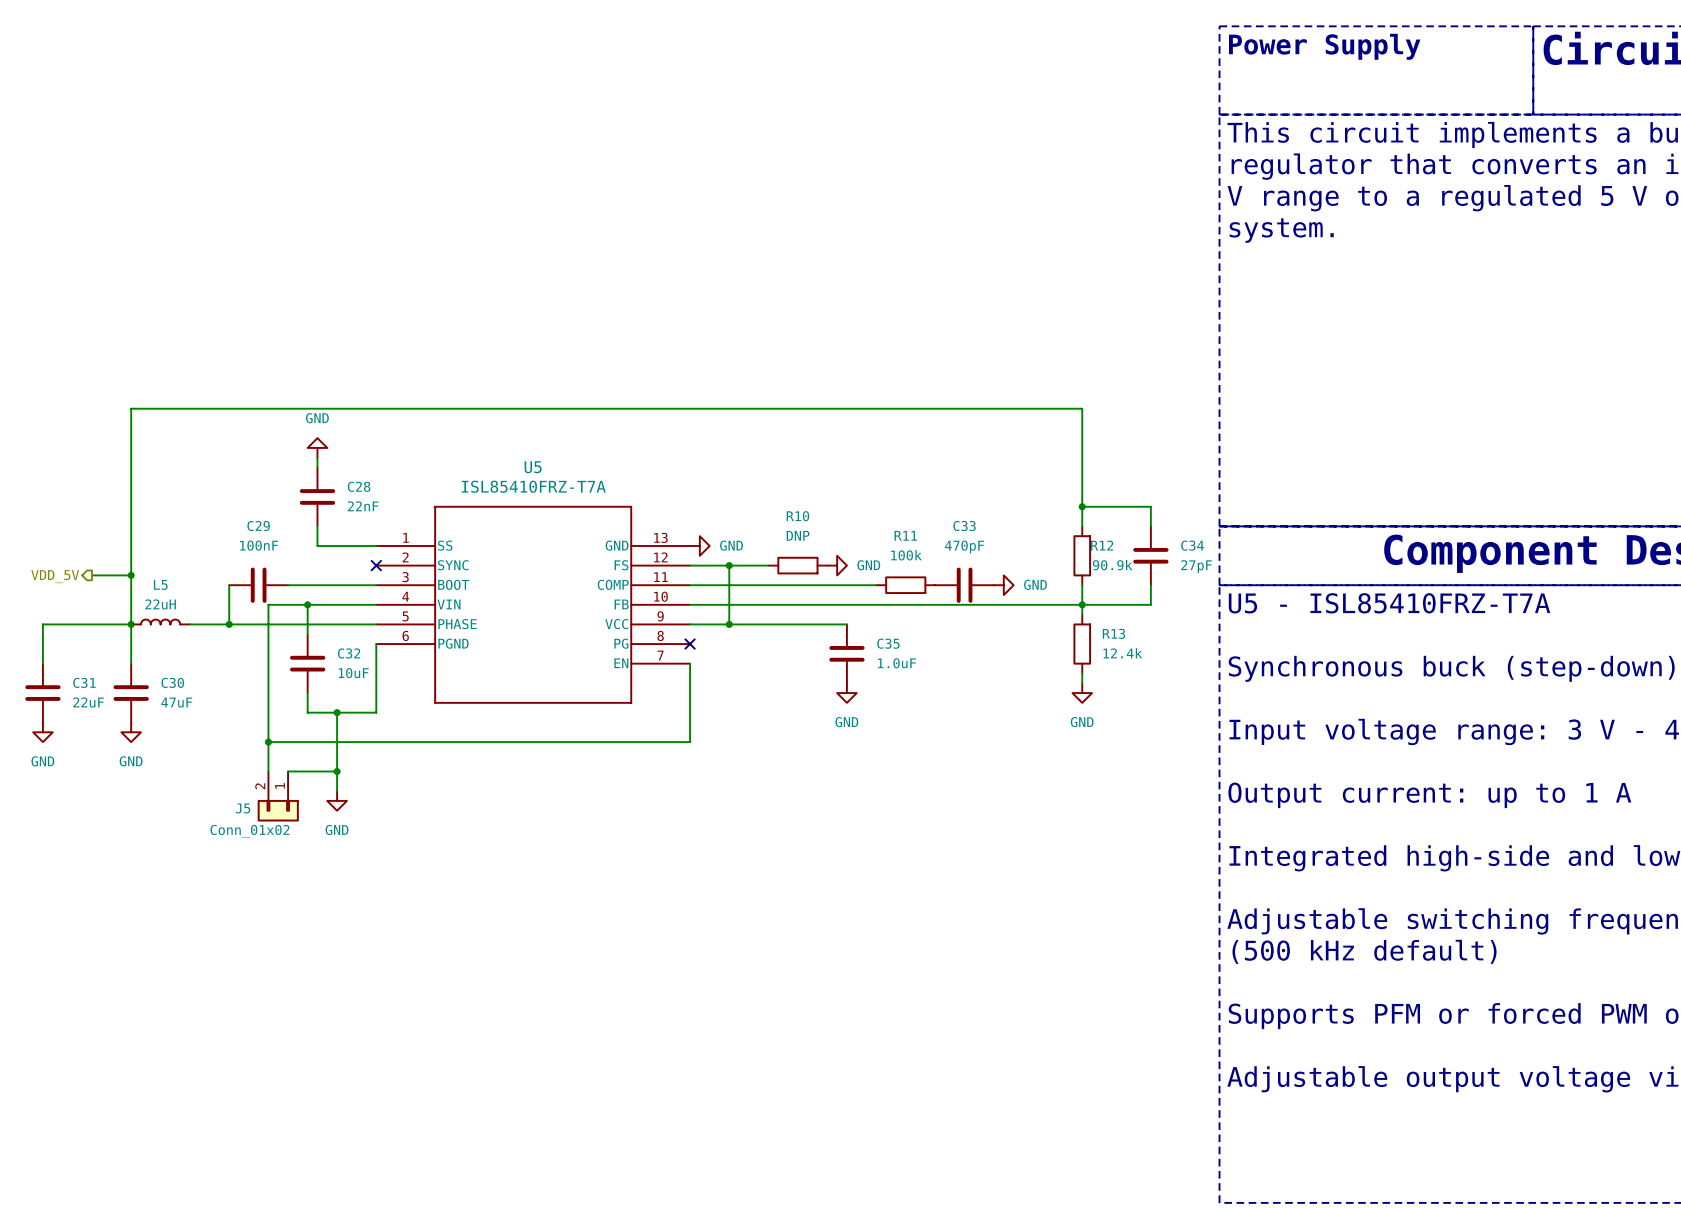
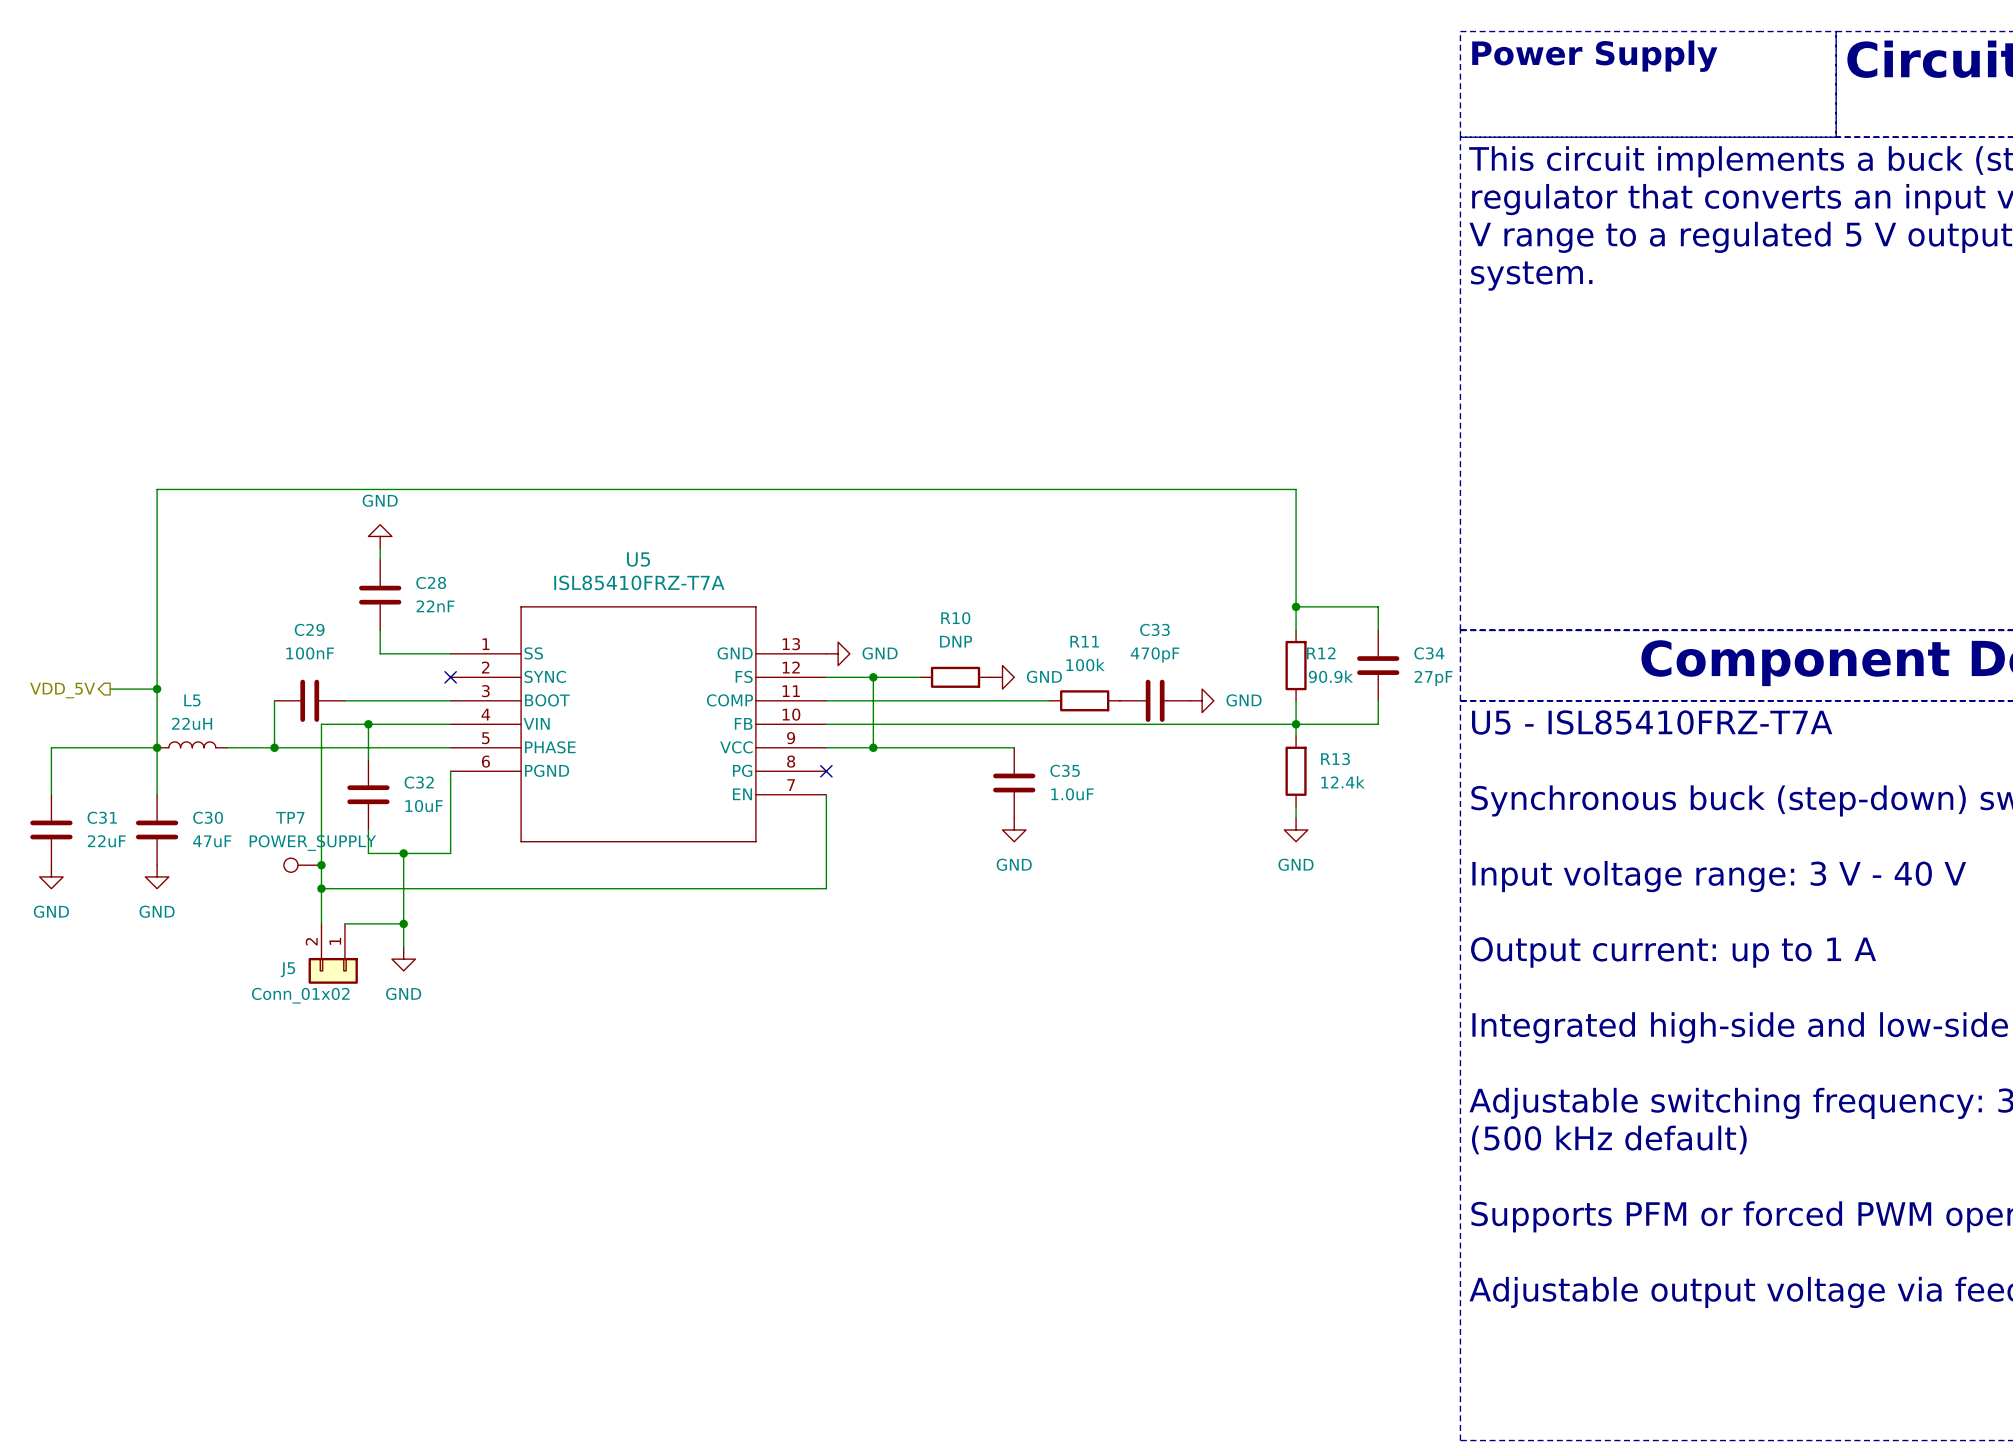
TP7: none -> POWER_SUPPLY (302, 865)
junction: none -> (321, 865)

